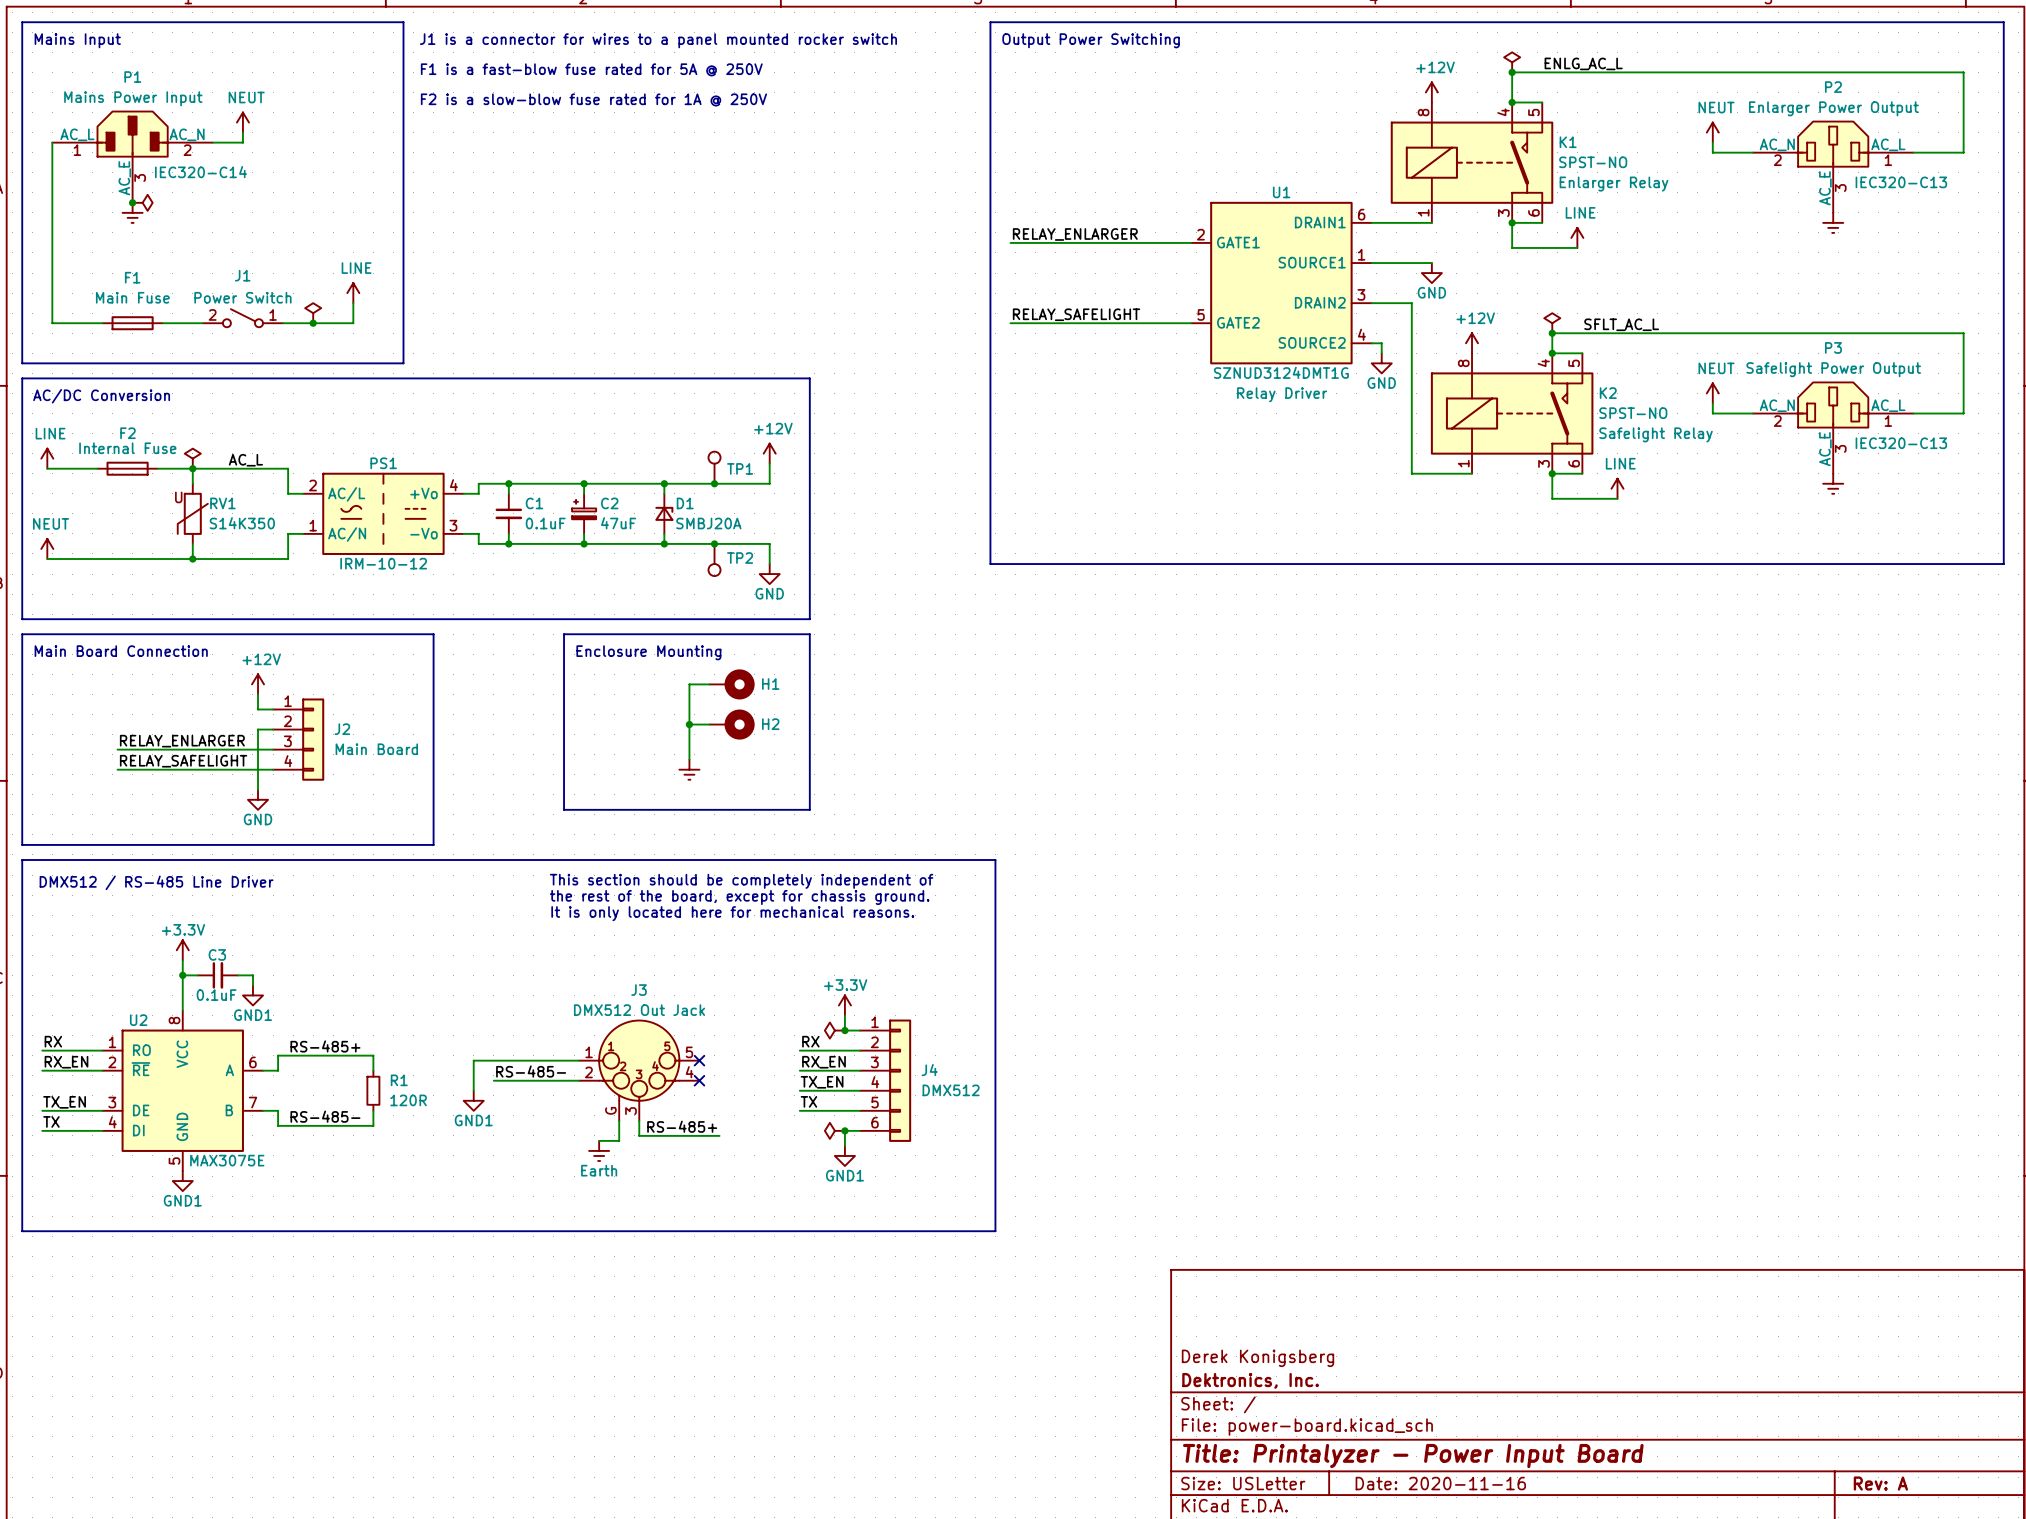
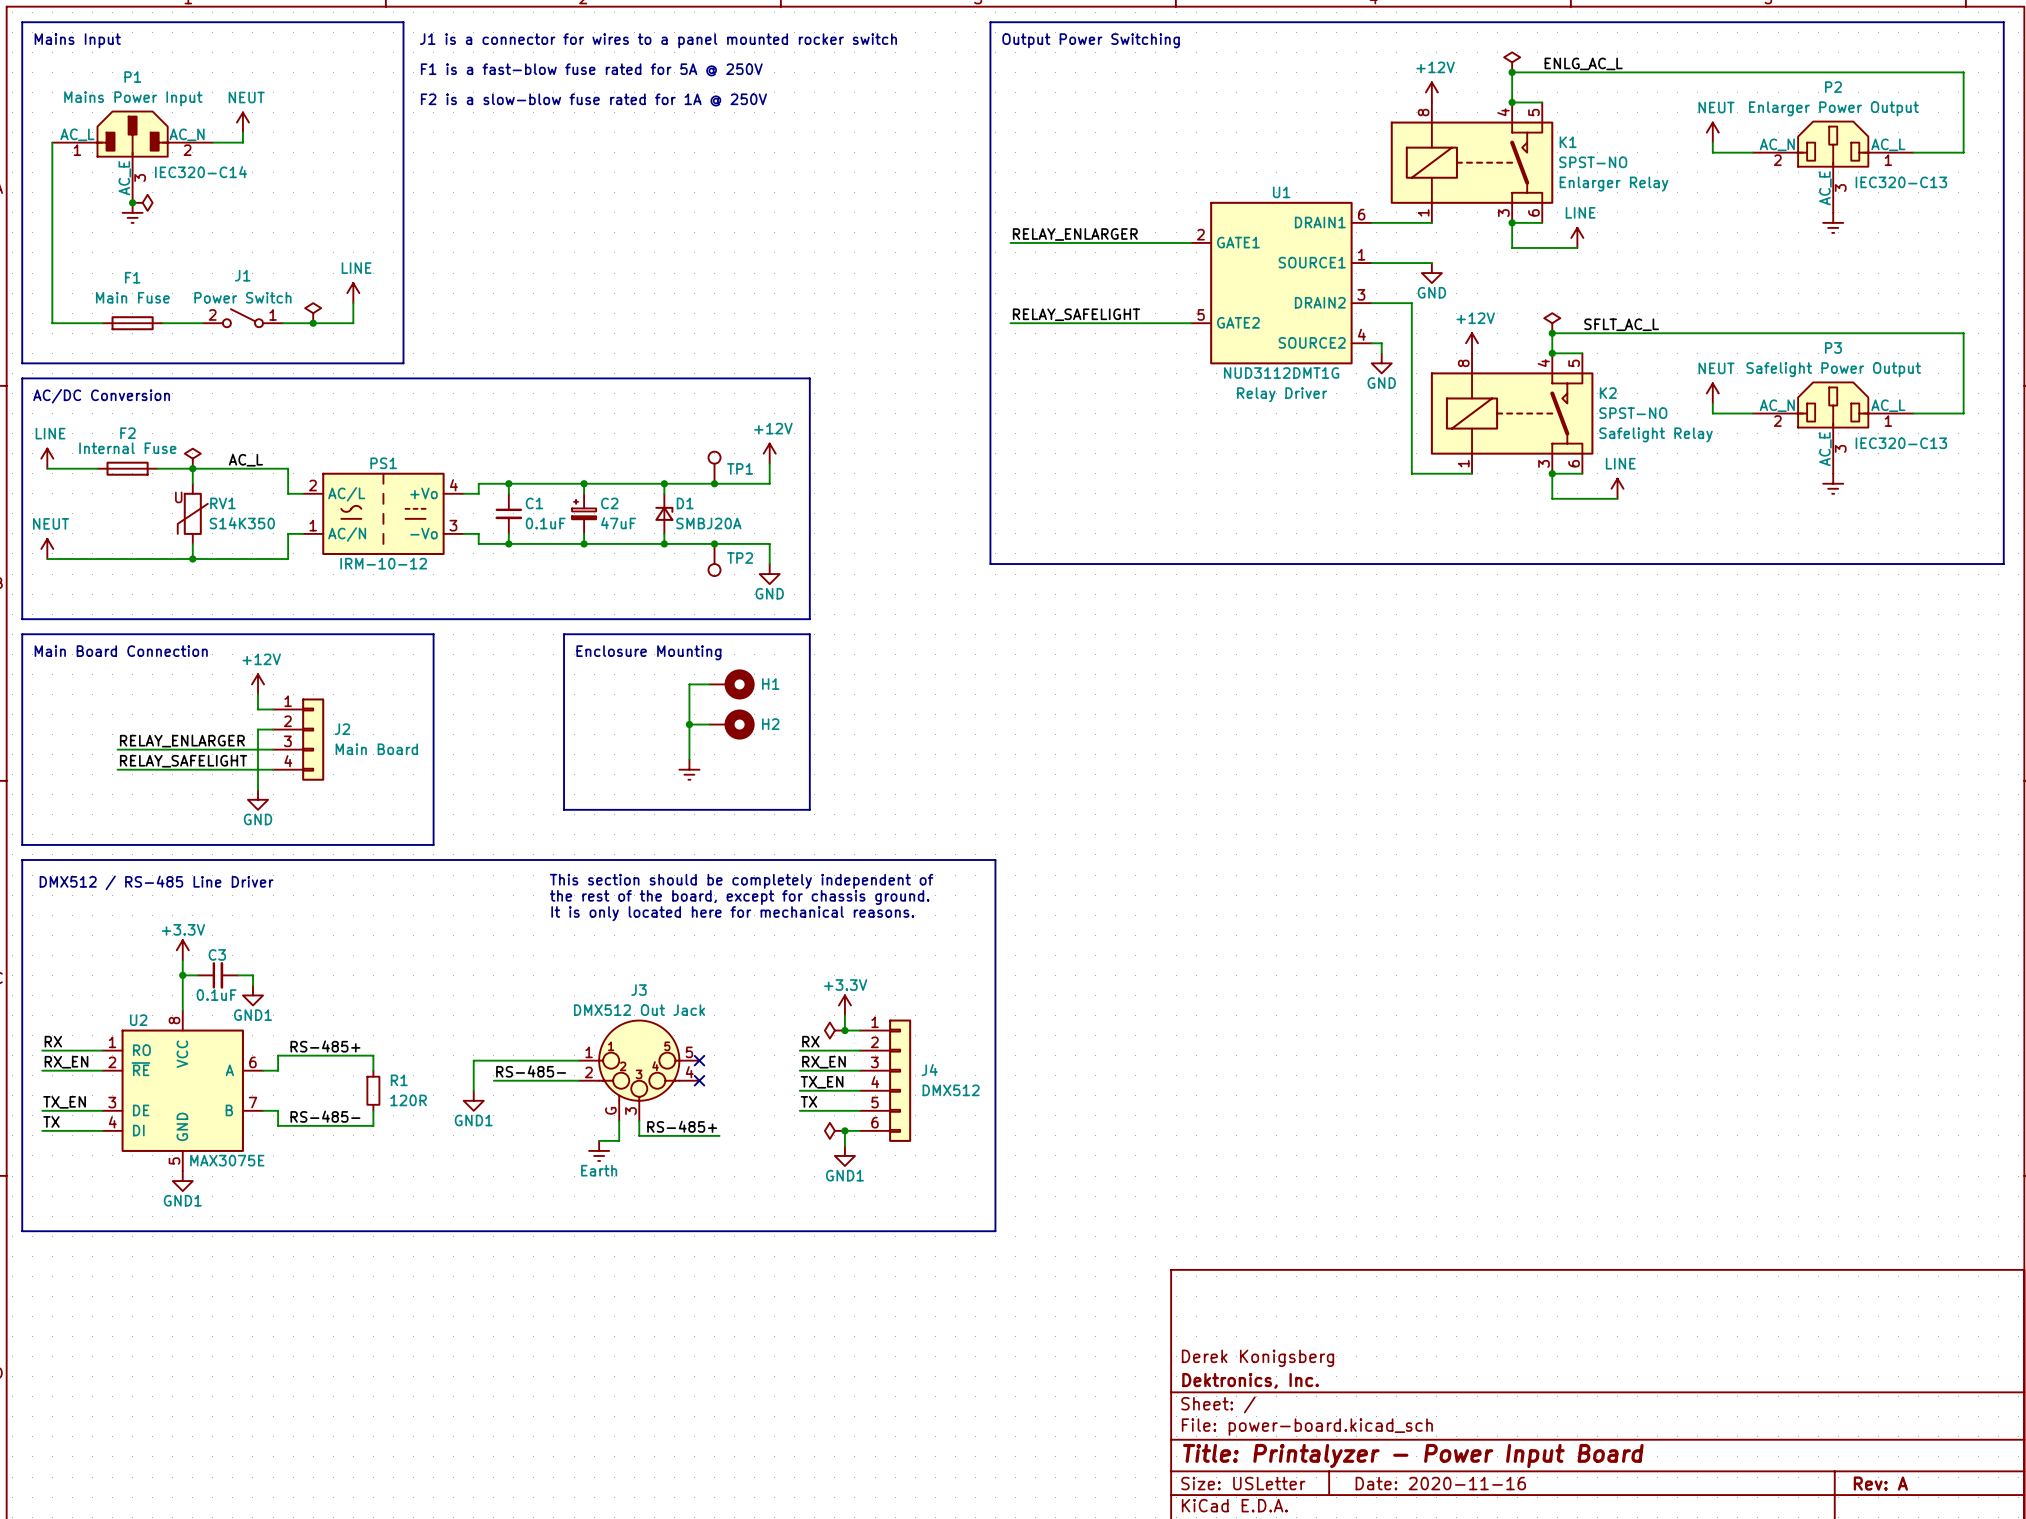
U1 value: SZNUD3124DMT1G (1281, 372) -> NUD3112DMT1G (1281, 373)

